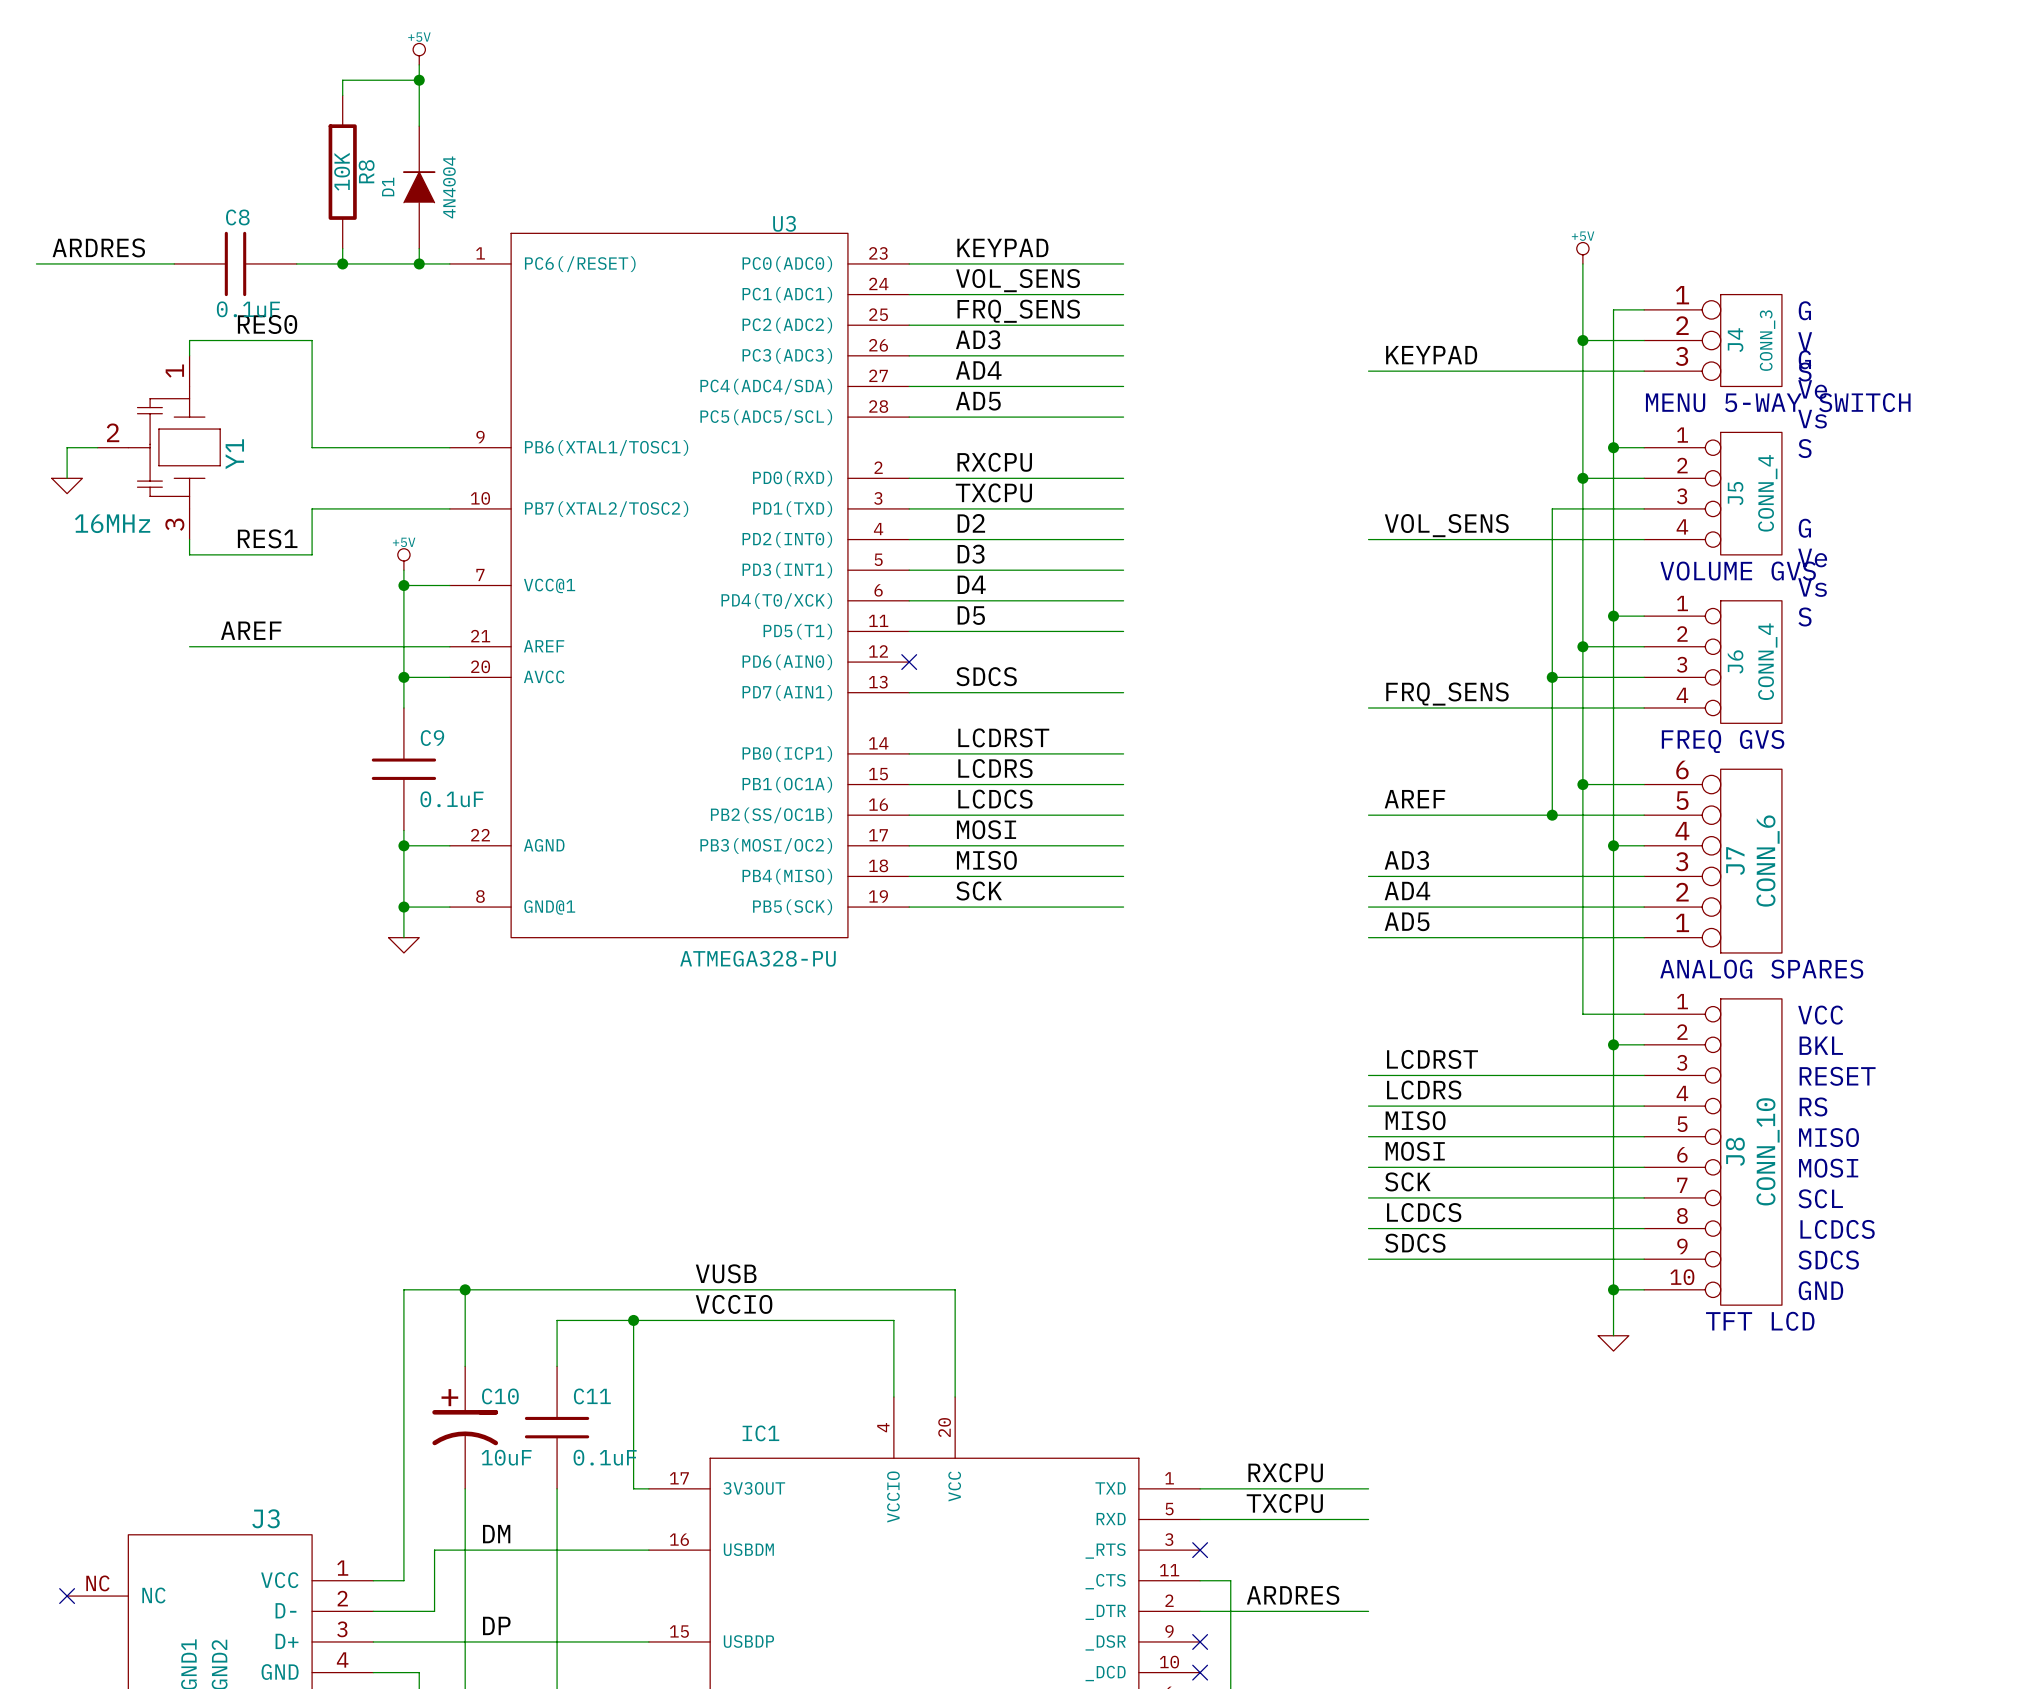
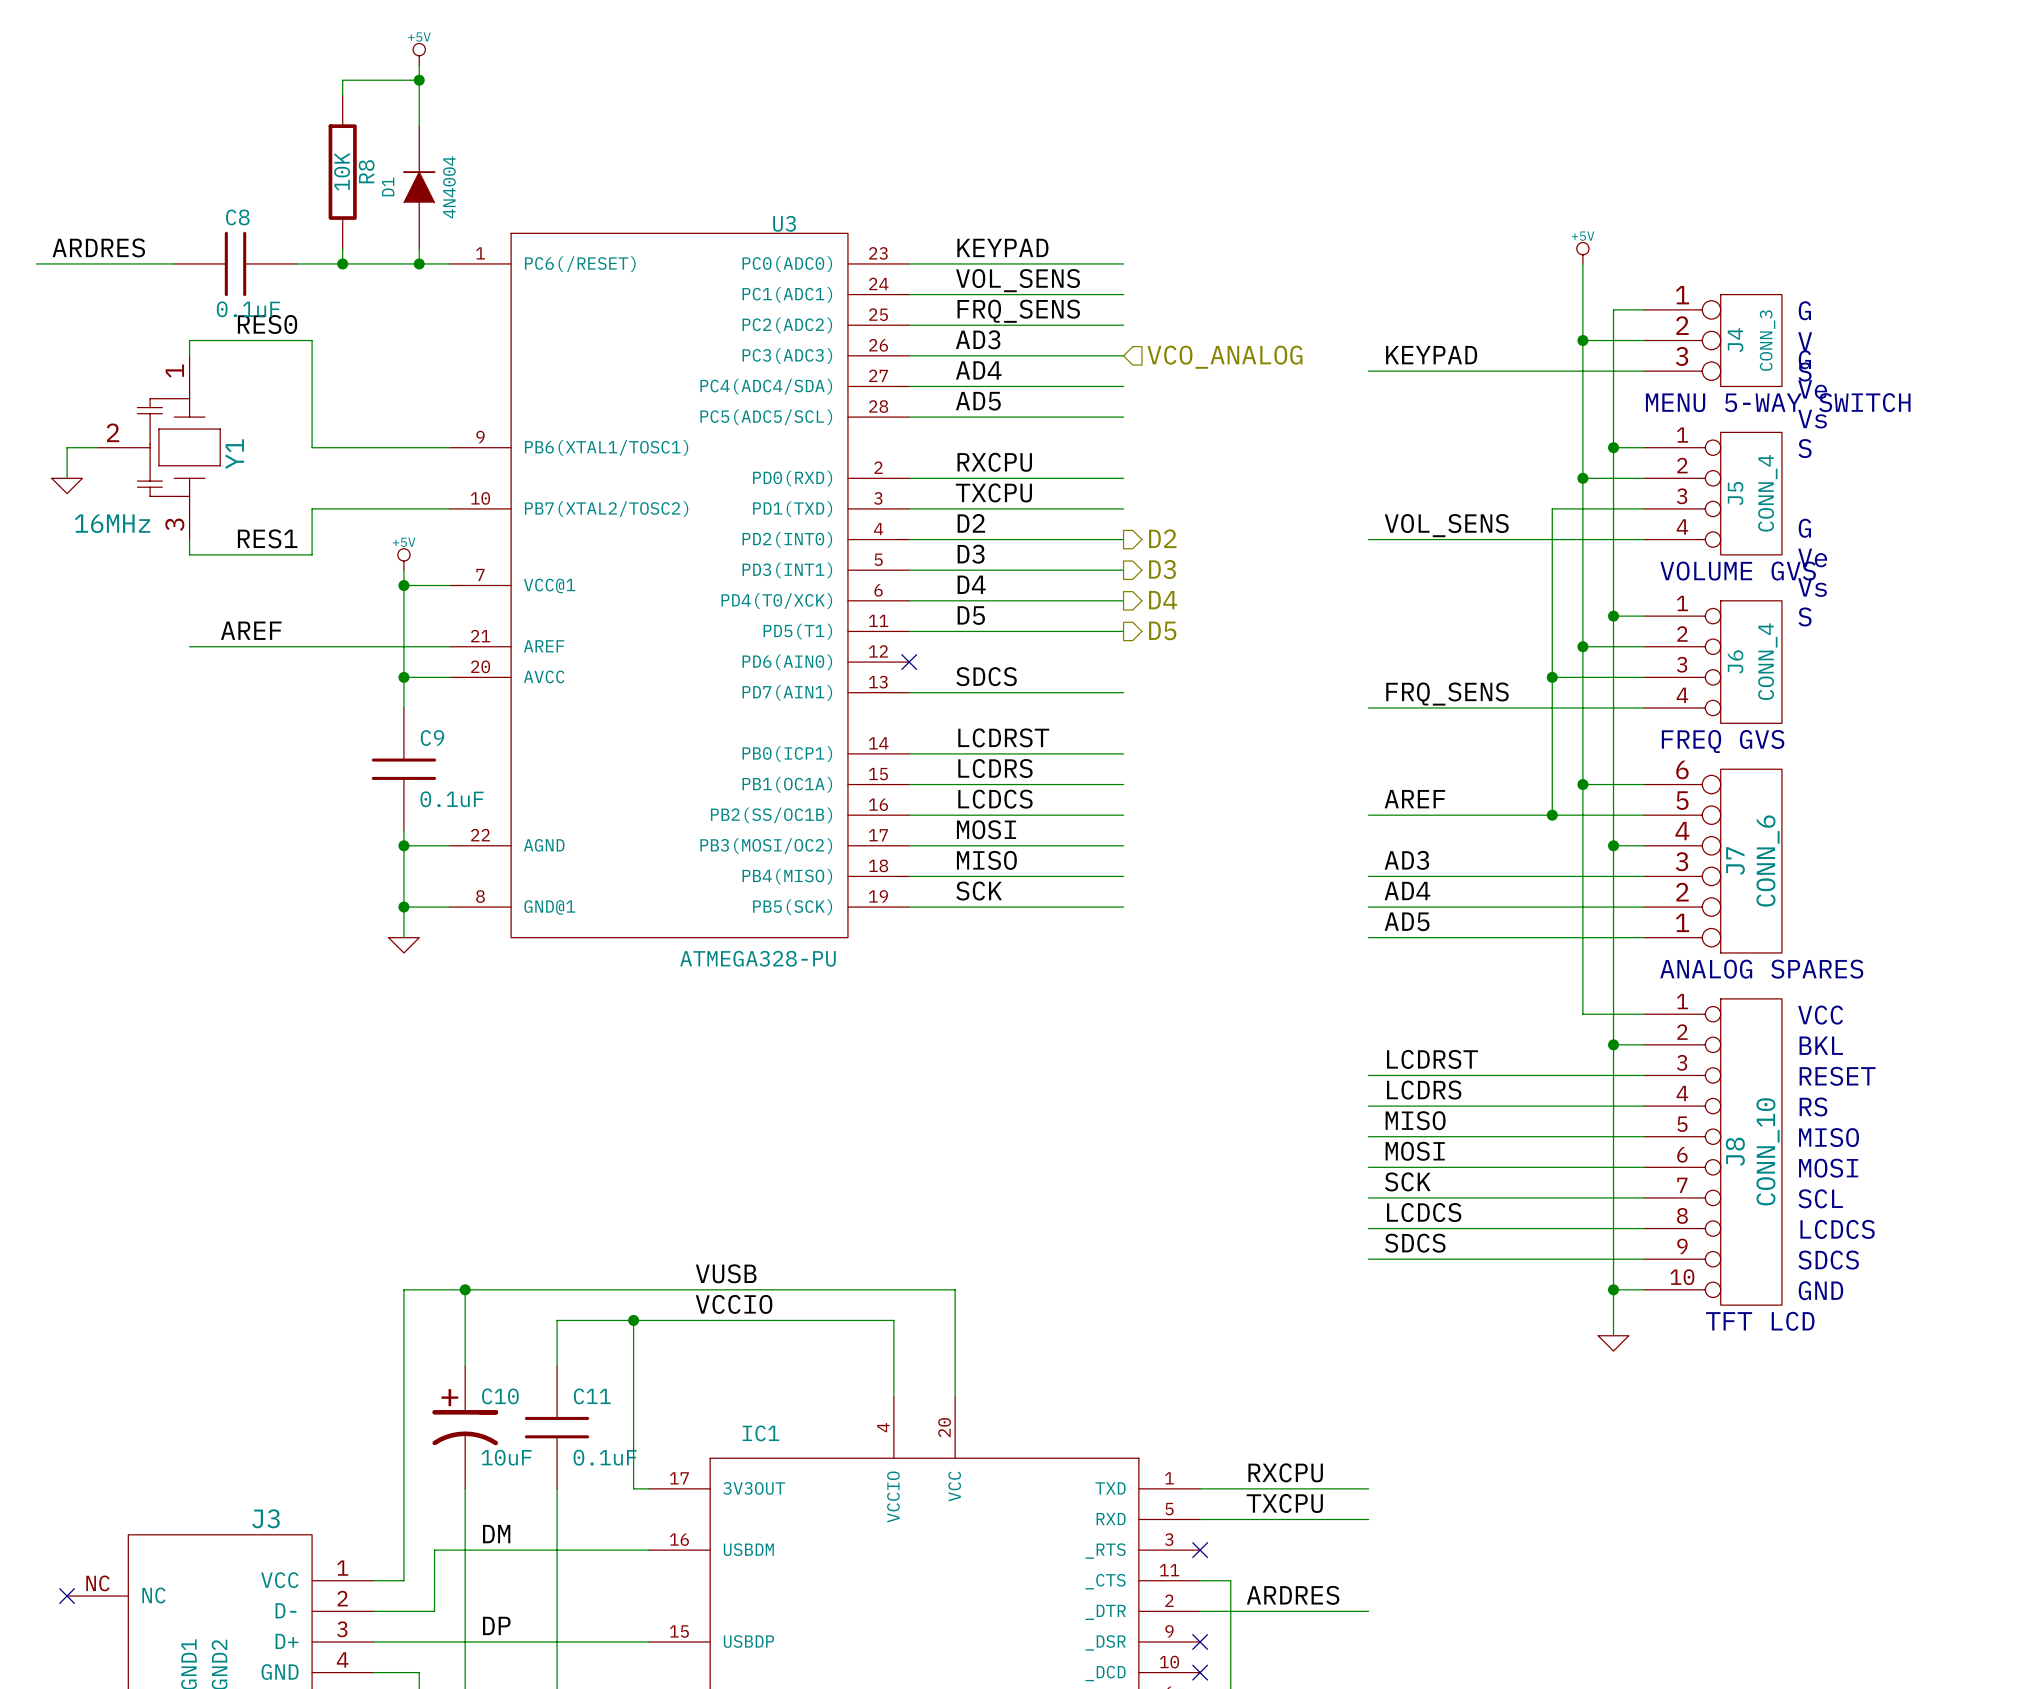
hierarchical label: none -> VCO_ANALOG (1224, 357)
hierarchical label: none -> D2 (1162, 538)
hierarchical label: none -> D3 (1162, 569)
hierarchical label: none -> D4 (1163, 600)
hierarchical label: none -> D5 (1162, 630)

